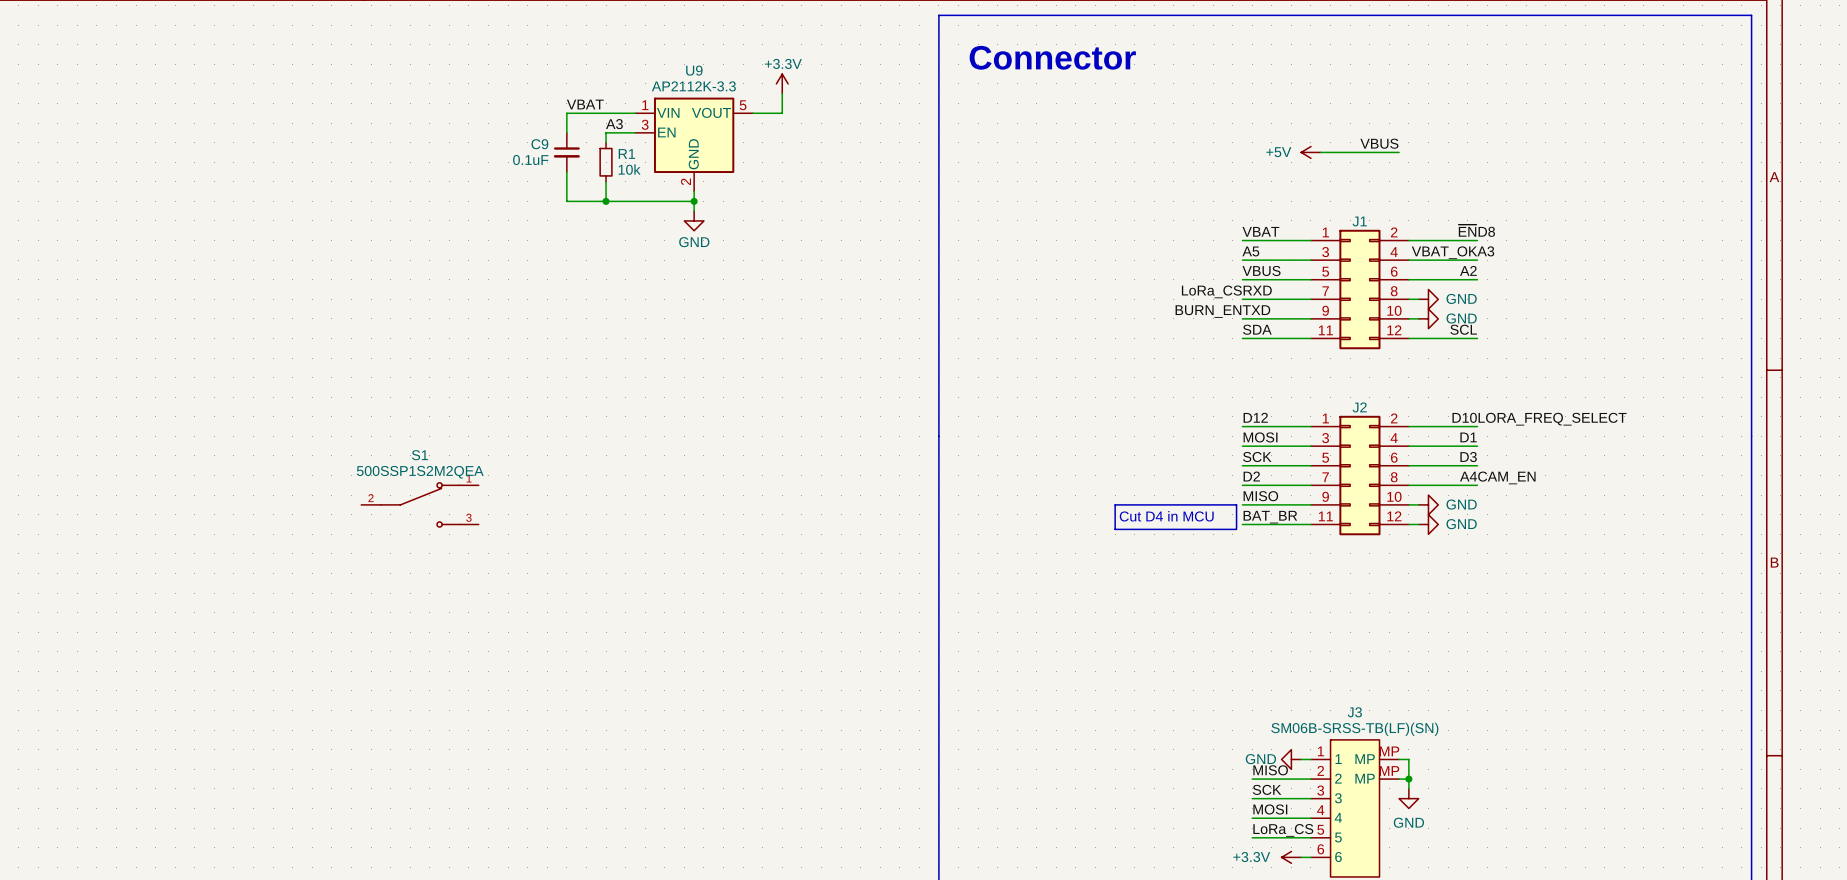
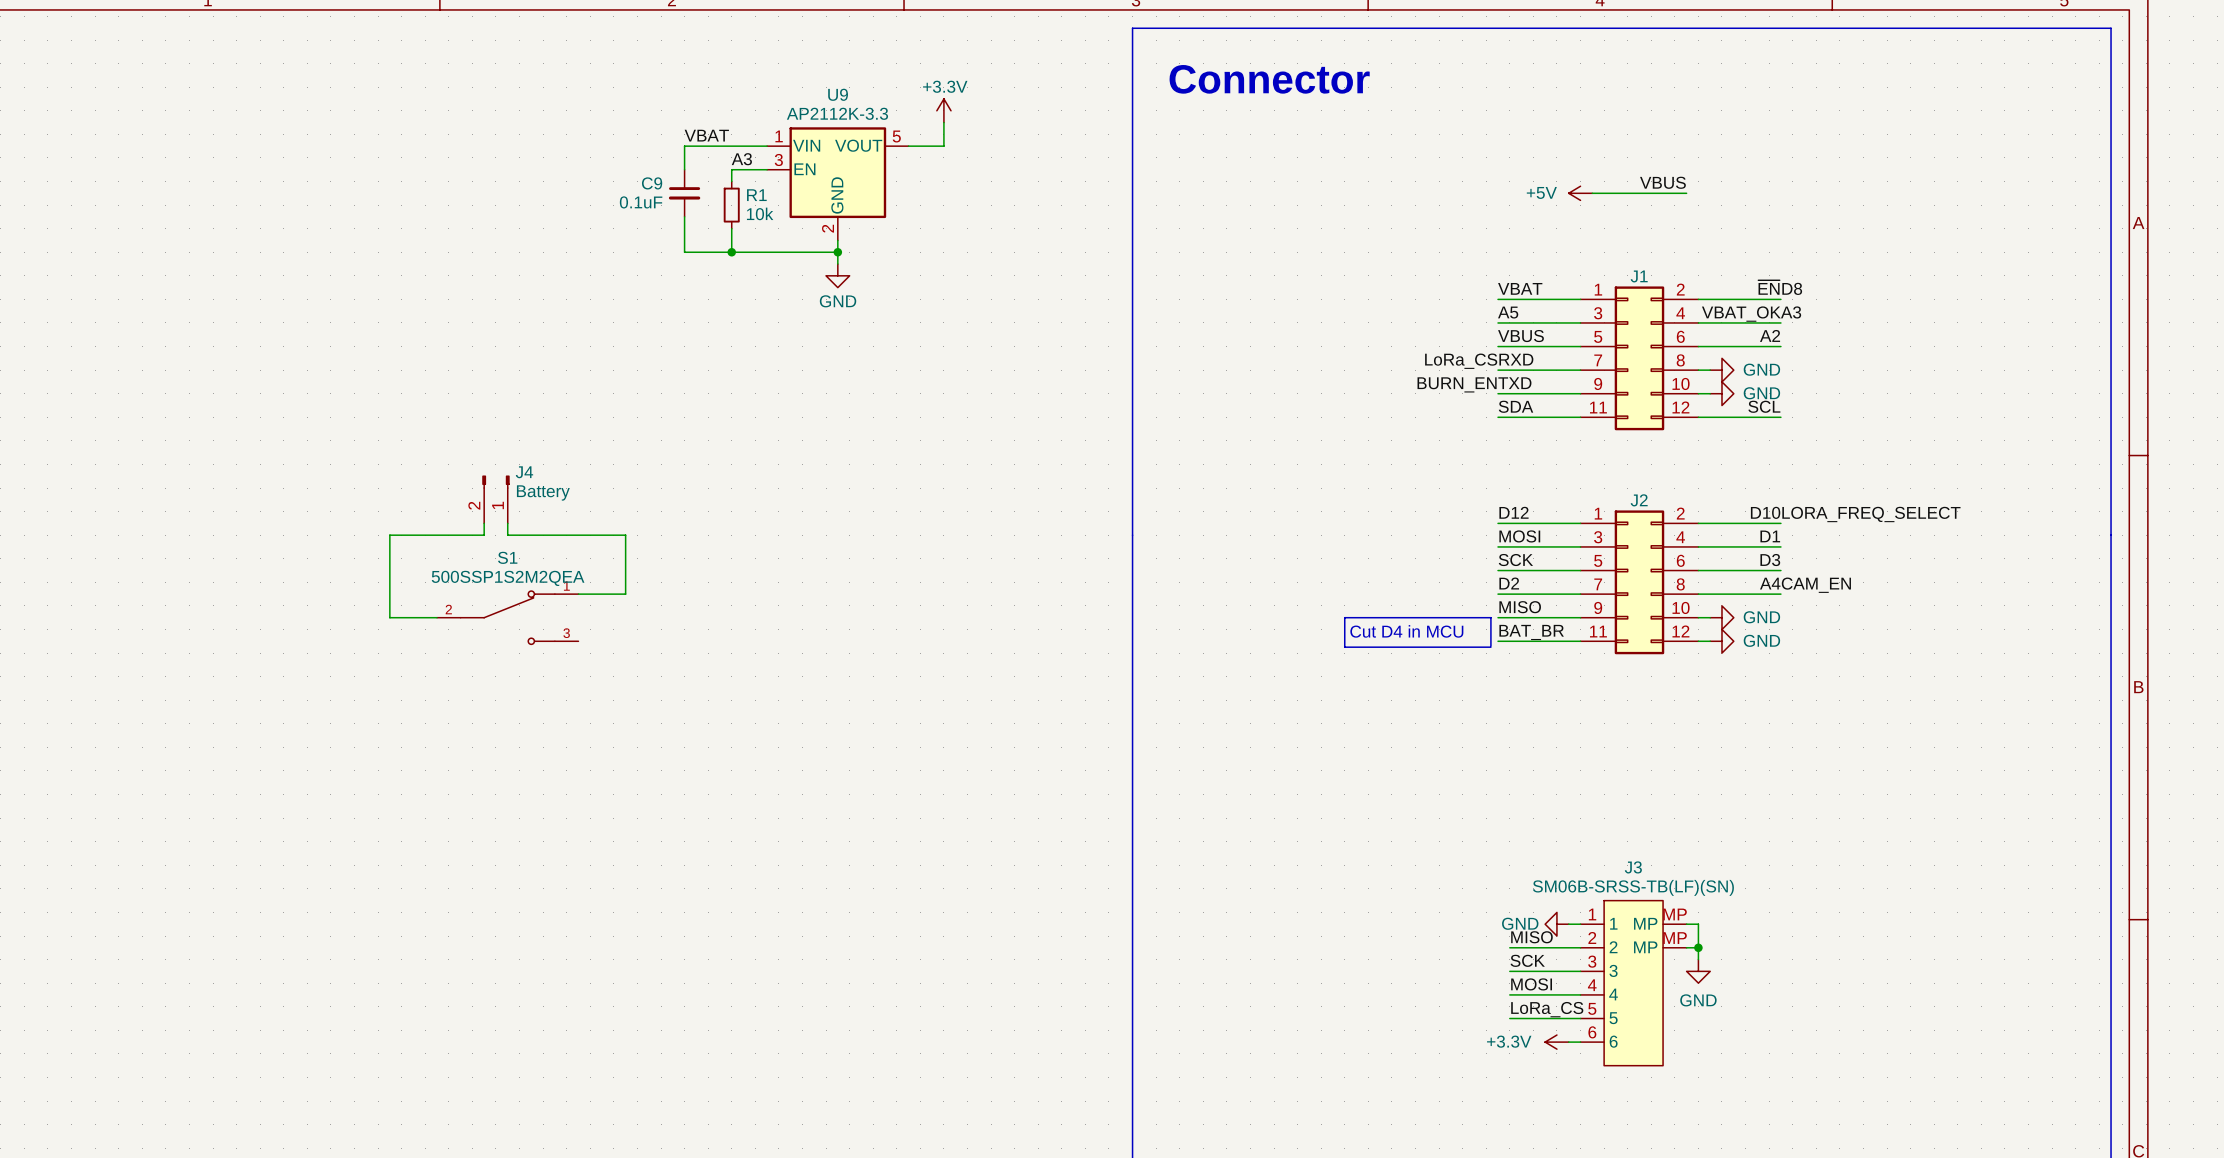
J4: none -> Battery (495, 499)
wire: none -> (484, 523) (484, 535) (389, 535) (389, 617) (437, 617)
wire: none -> (507, 523) (507, 535) (625, 535) (625, 594) (578, 594)

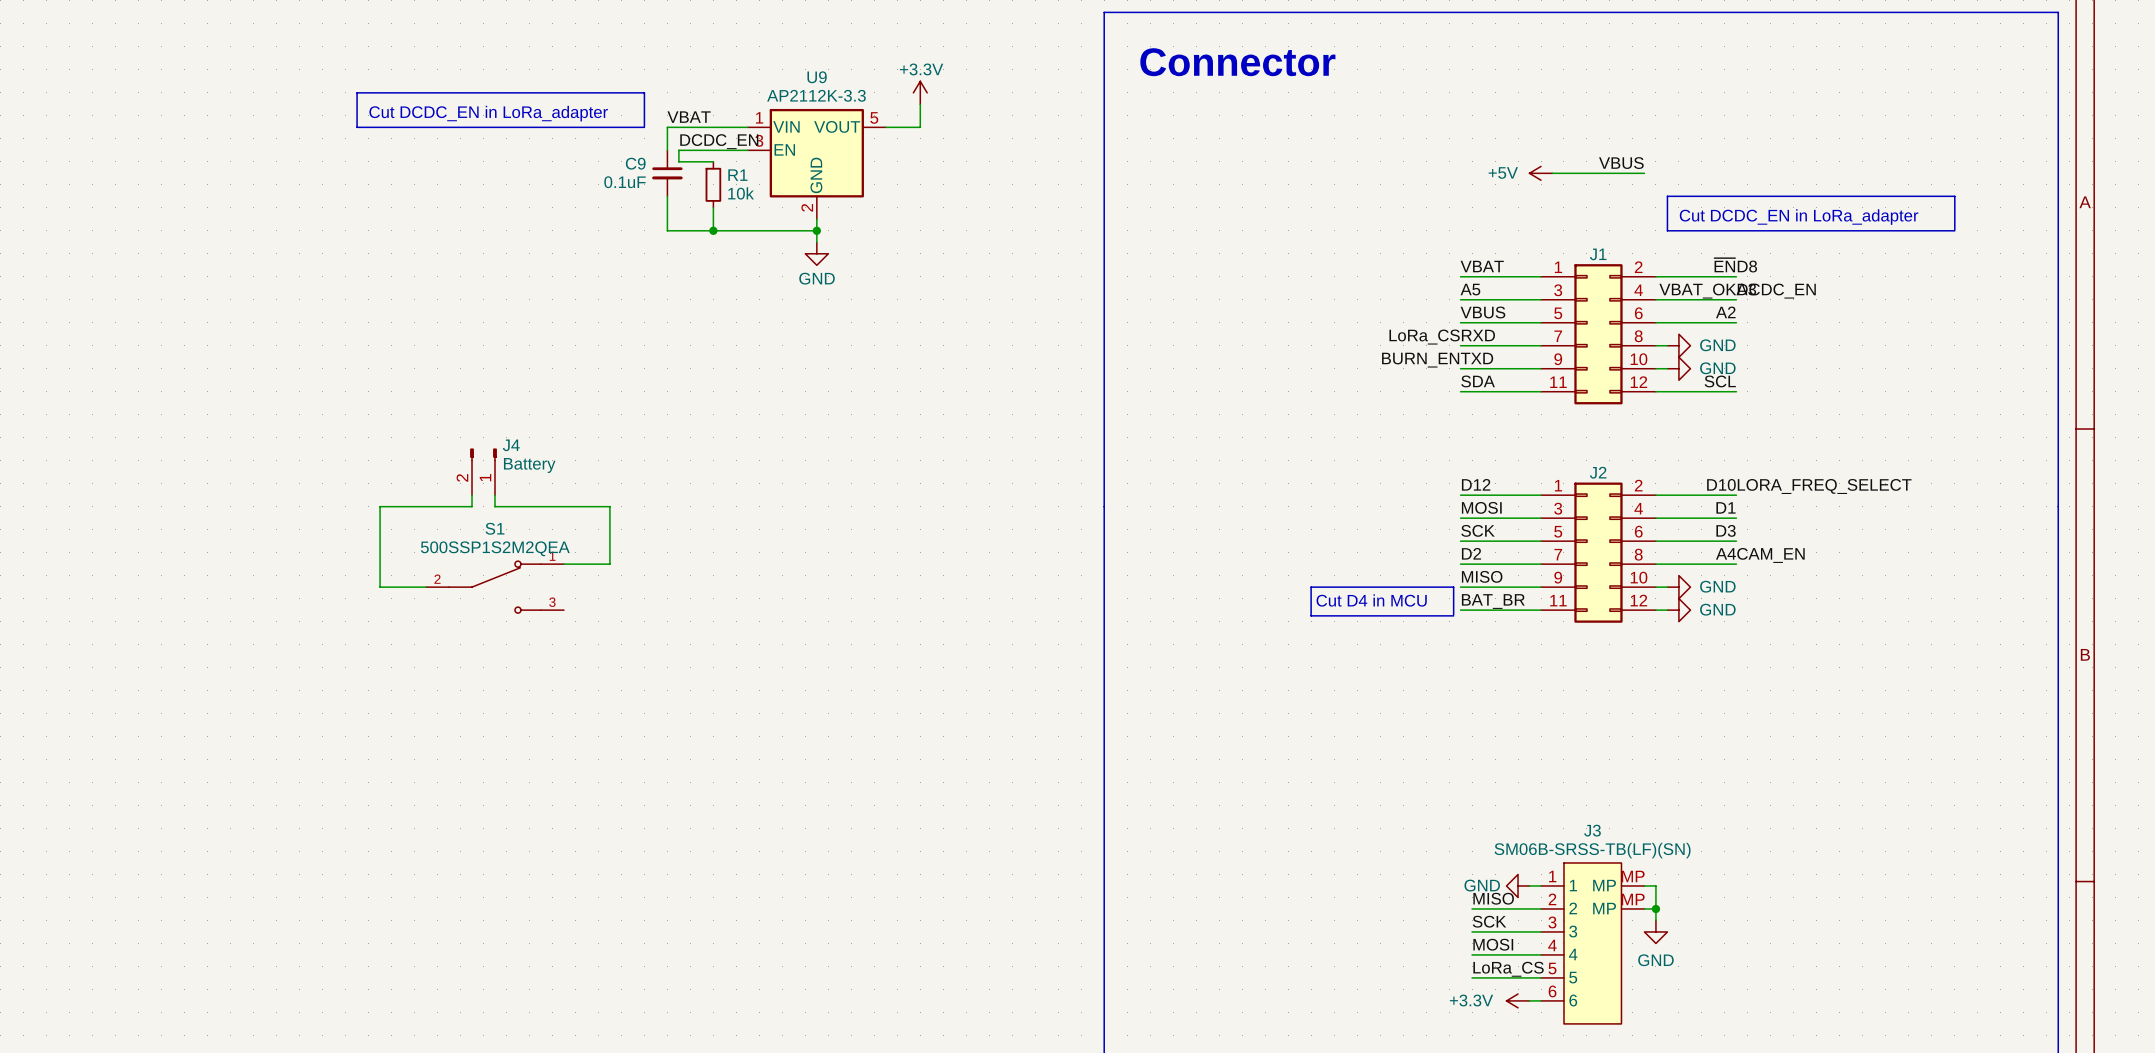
text: none -> Cut DCDC_EN in LoRa_adapter (488, 113)
line: none -> (644, 126) (644, 92) (357, 92) (357, 127) (644, 127)
label: A3 (741, 159) -> none
label: none -> DCDC_EN (719, 141)
wire: (731, 169) (731, 181) -> (713, 150) (678, 150) (678, 161) (713, 161)
text: none -> Cut DCDC_EN in LoRa_adapter (1799, 217)
line: none -> (1954, 229) (1954, 196) (1667, 196) (1667, 230) (1954, 230)
label: none -> DCDC_EN (1776, 291)

